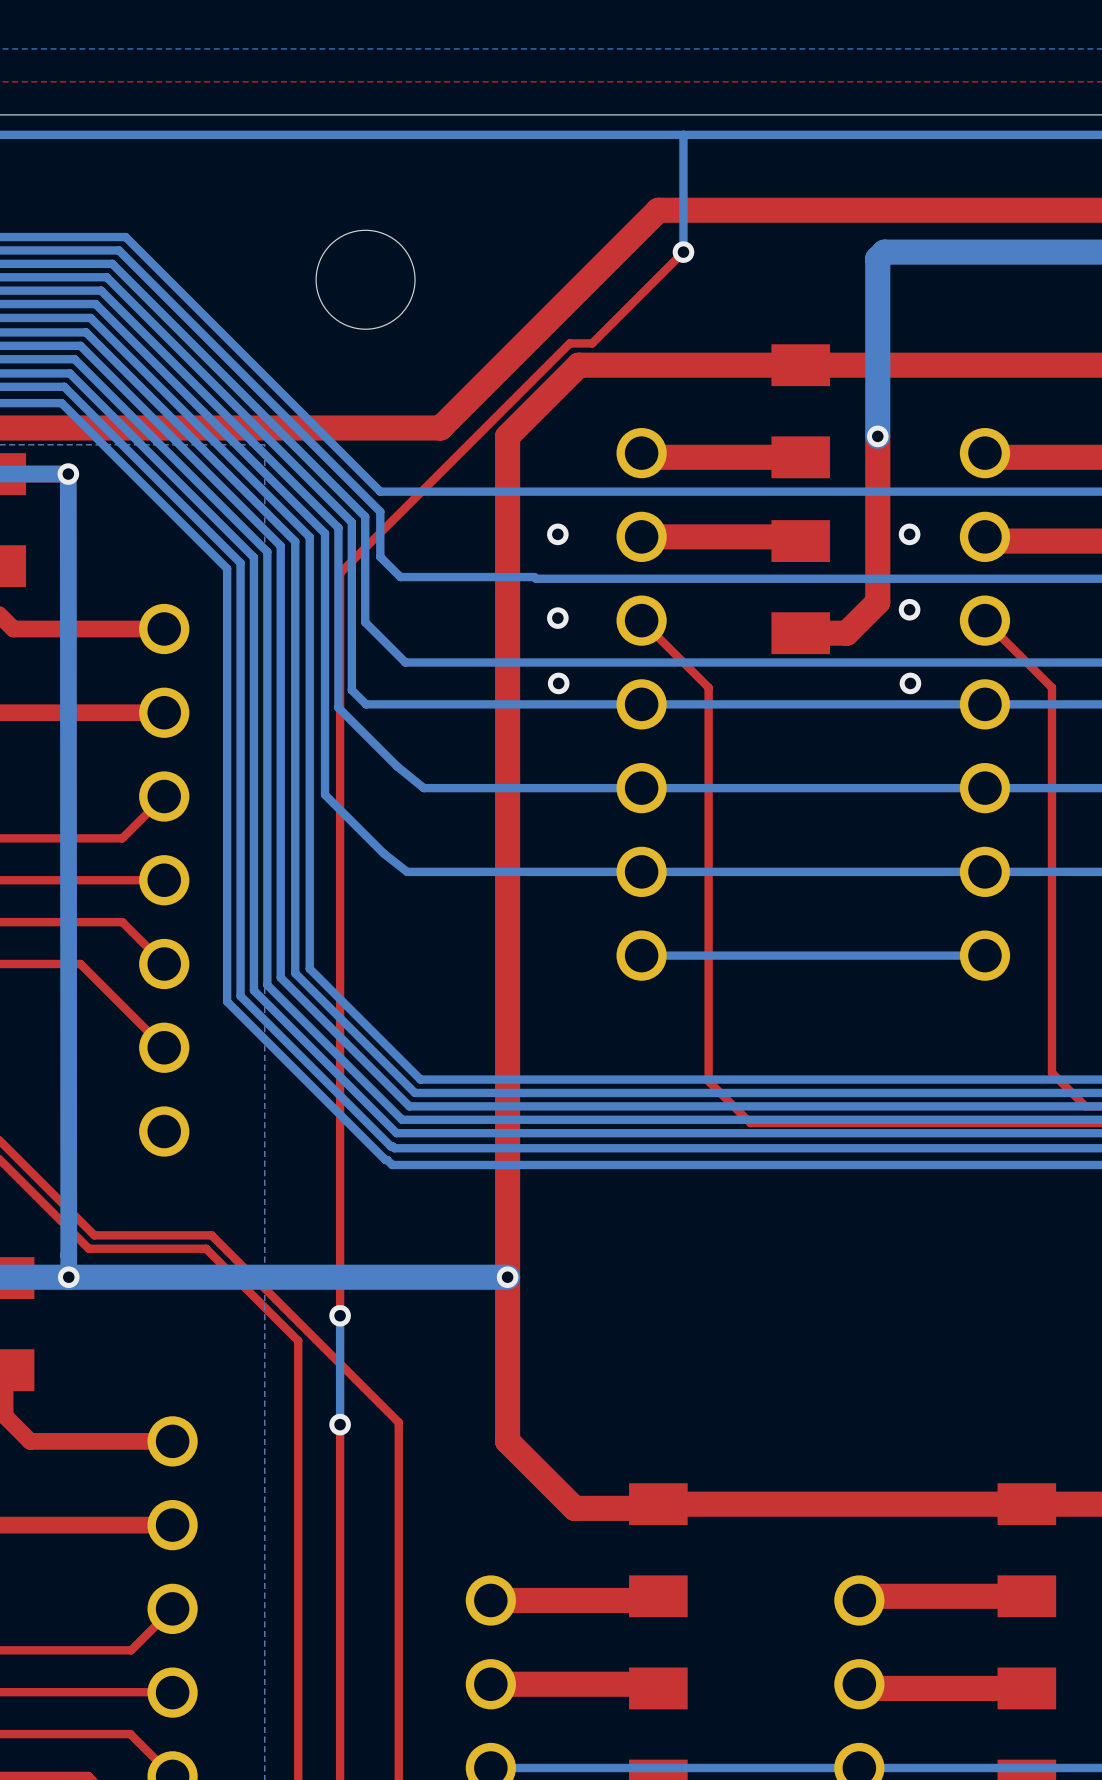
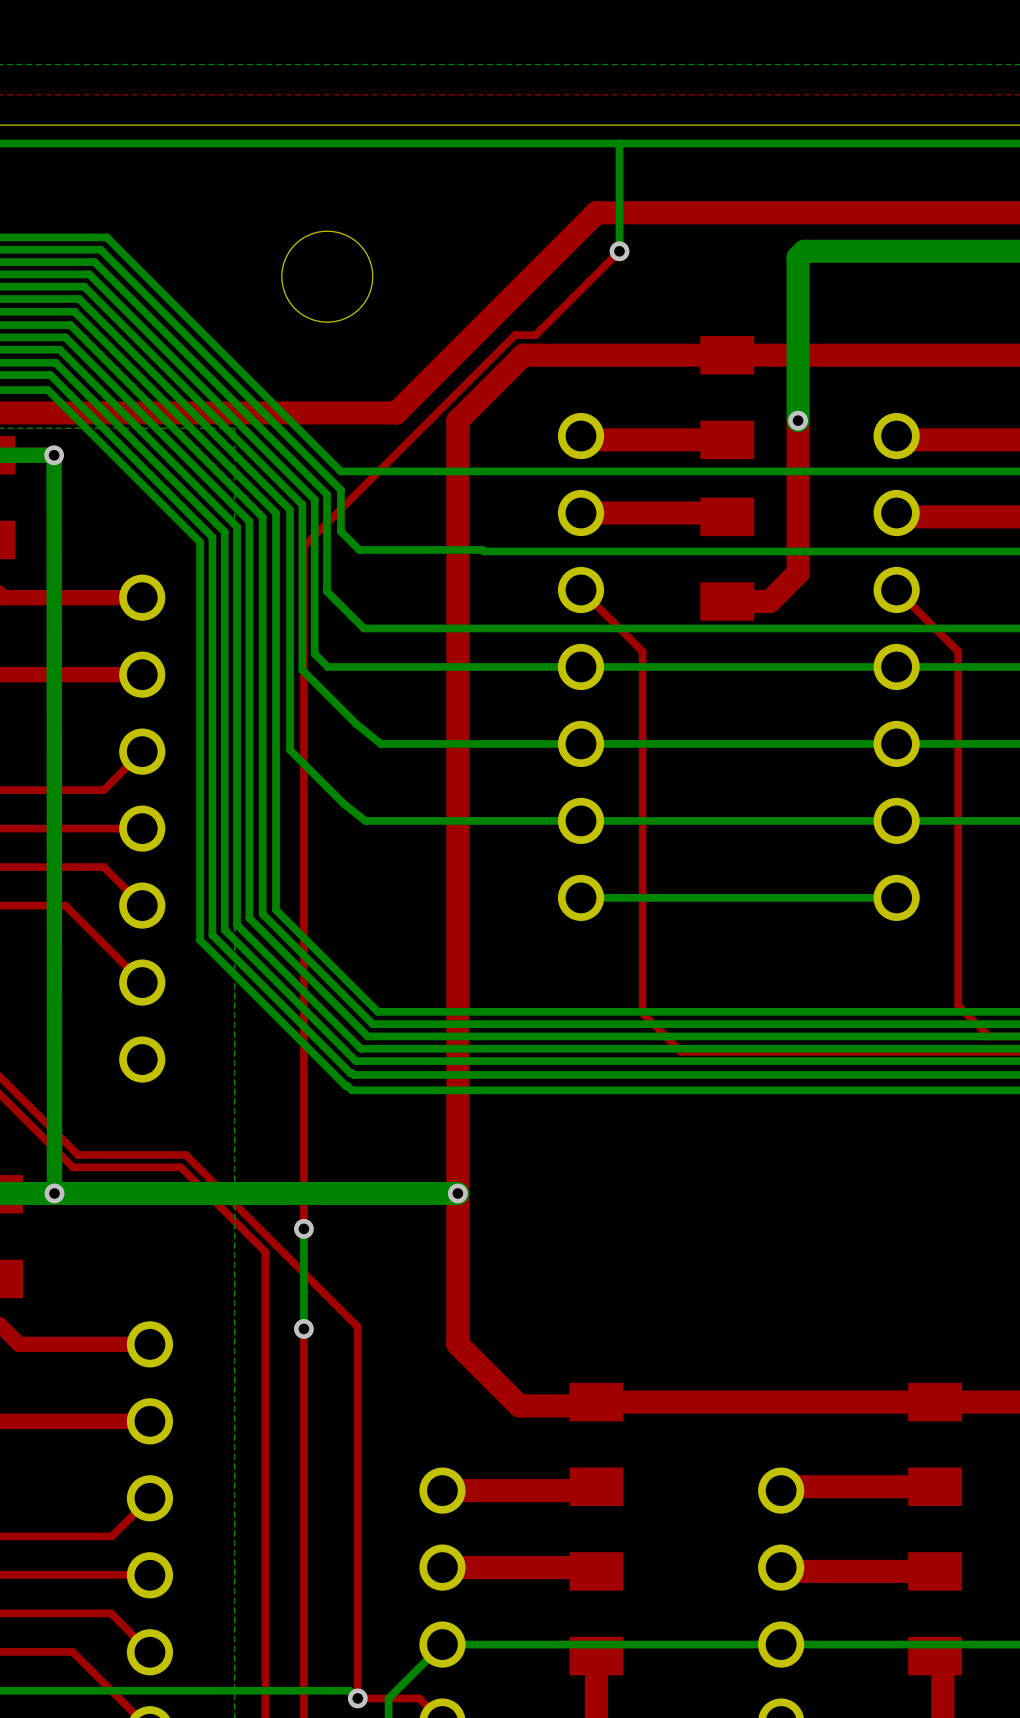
via: (557, 534) -> none
via: (909, 534) -> none
via: (909, 609) -> none
via: (557, 618) -> none
via: (558, 683) -> none
via: (910, 683) -> none

